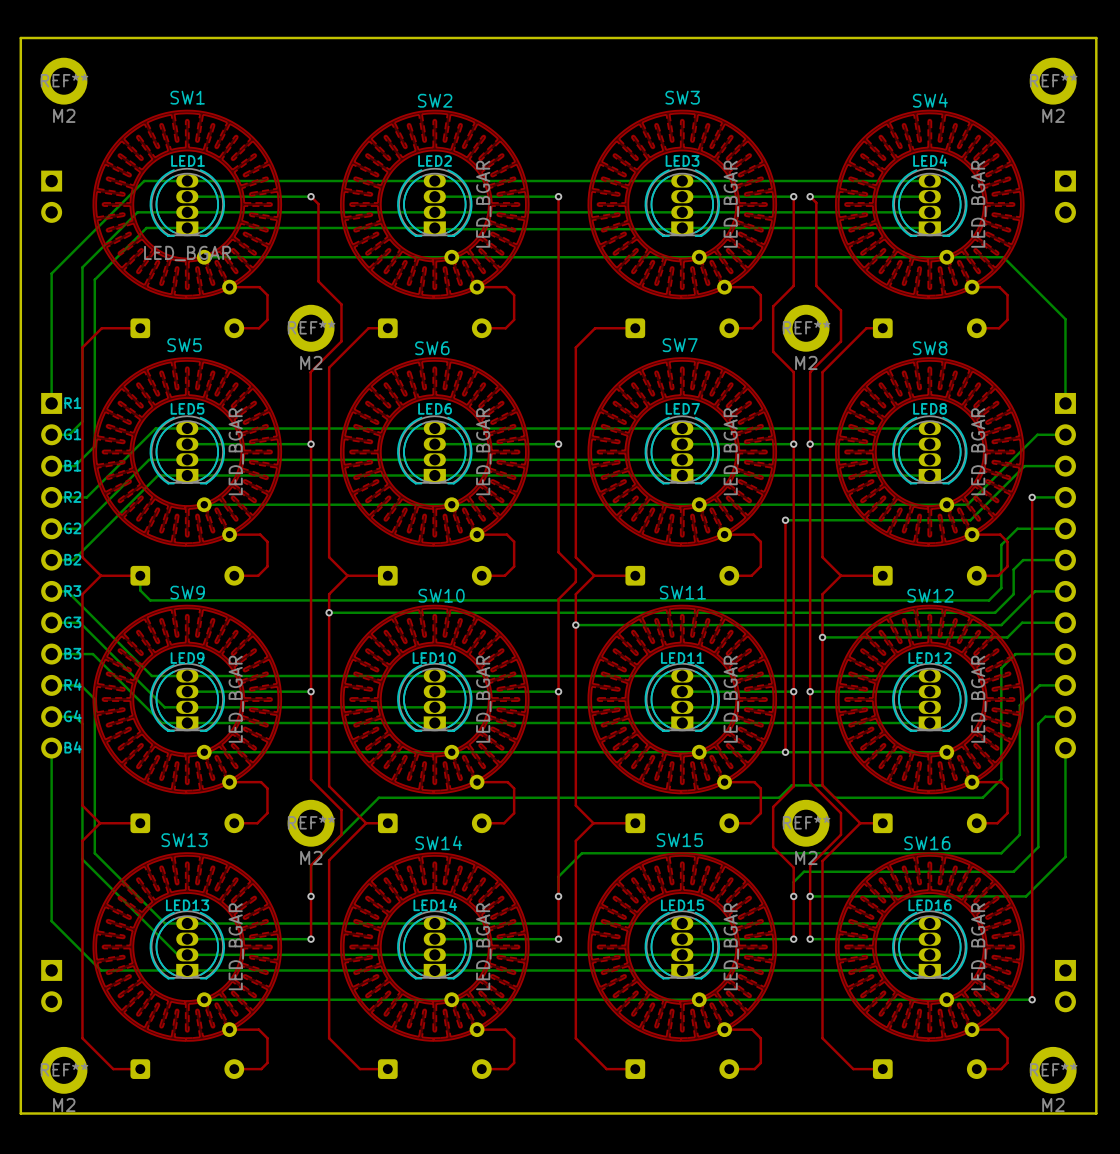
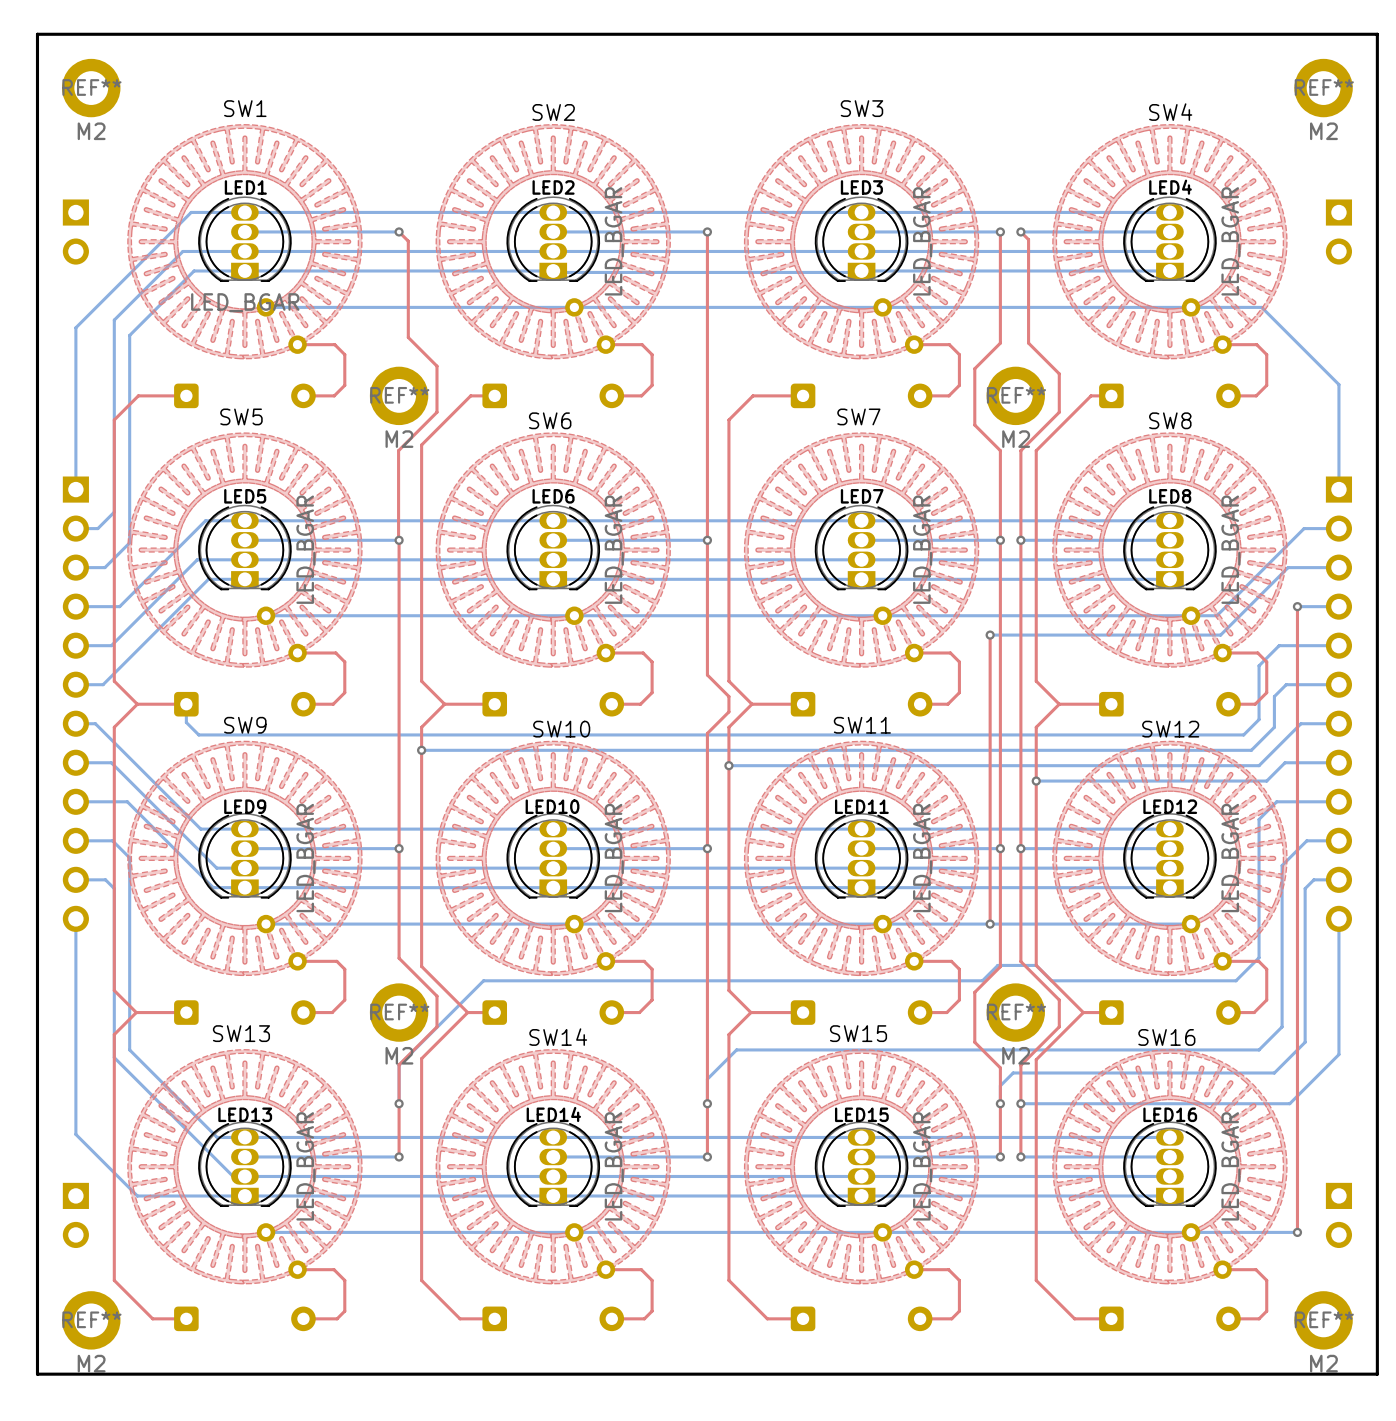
text: R1 (72, 403) -> none
text: G1 (72, 434) -> none
text: B1 (72, 465) -> none
text: R2 (72, 497) -> none
text: G2 (72, 528) -> none
text: B2 (72, 559) -> none
text: R3 (72, 591) -> none
text: G3 (72, 622) -> none
text: B3 (72, 653) -> none
text: R4 (73, 684) -> none
text: G4 (72, 716) -> none
text: B4 (73, 747) -> none

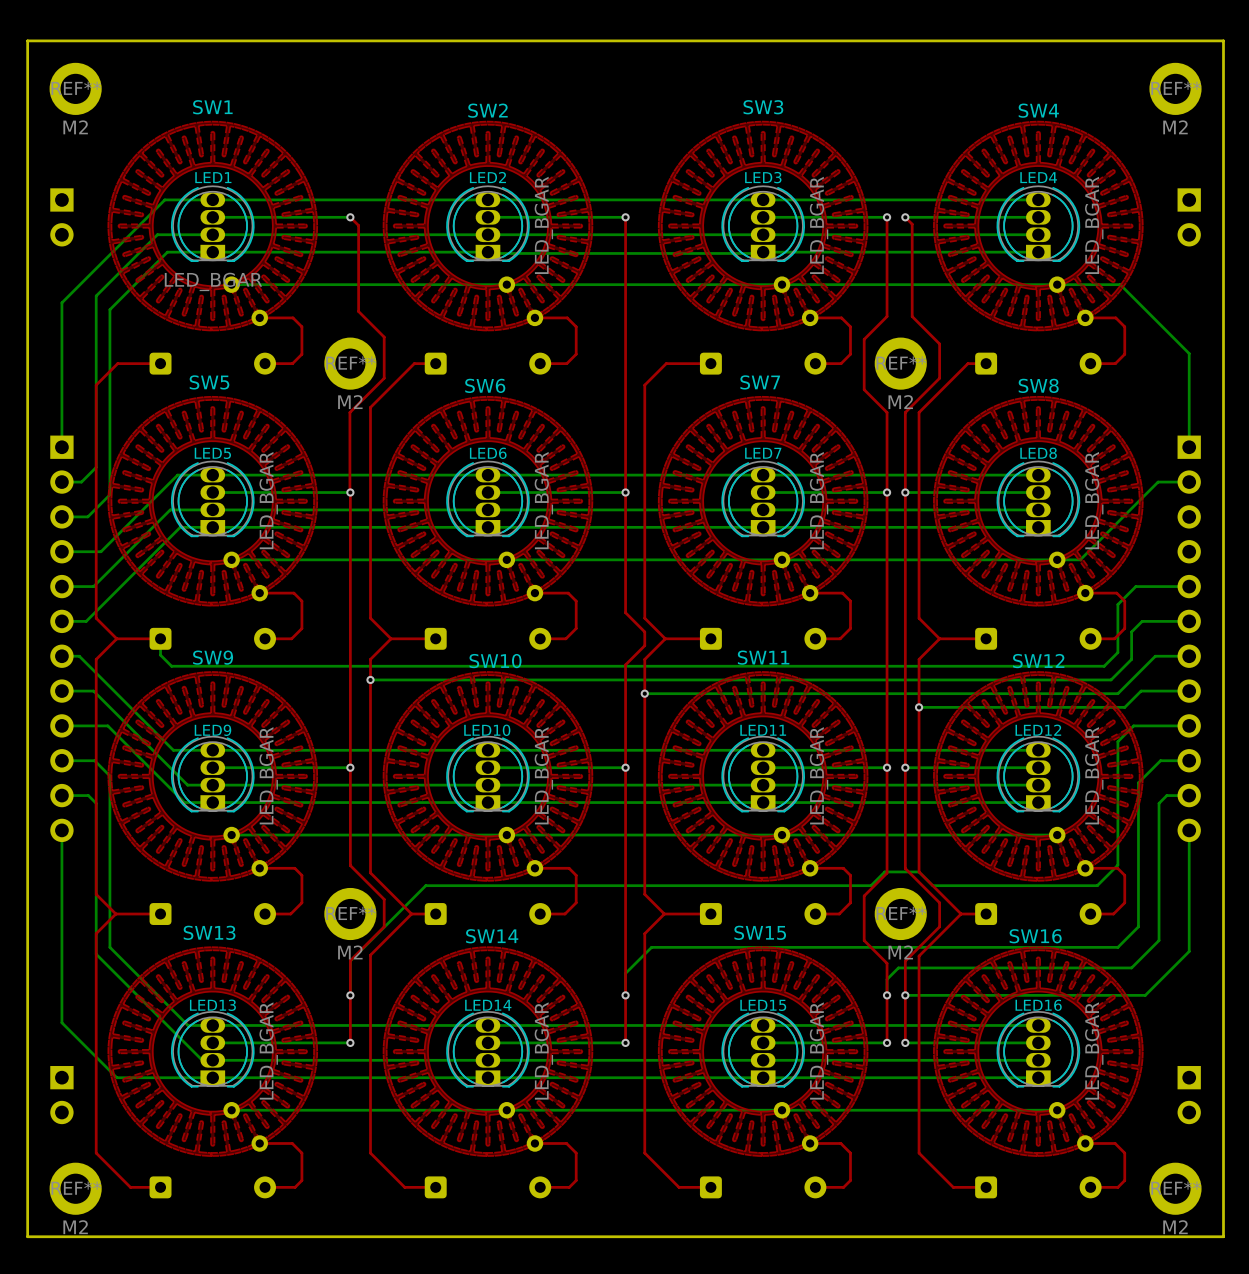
bottom track: (1338, 567) (1288, 567) (1220, 635) (990, 635) -> none
top track: (1297, 606) (1297, 1232) -> none
bottom track: (1297, 606) (1338, 606) -> none
via: (1297, 606) -> none
top track: (990, 635) (990, 924) -> none
via: (990, 635) -> none
via: (990, 924) -> none
bottom track: (1191, 1232) (1297, 1232) -> none
via: (1297, 1232) -> none

